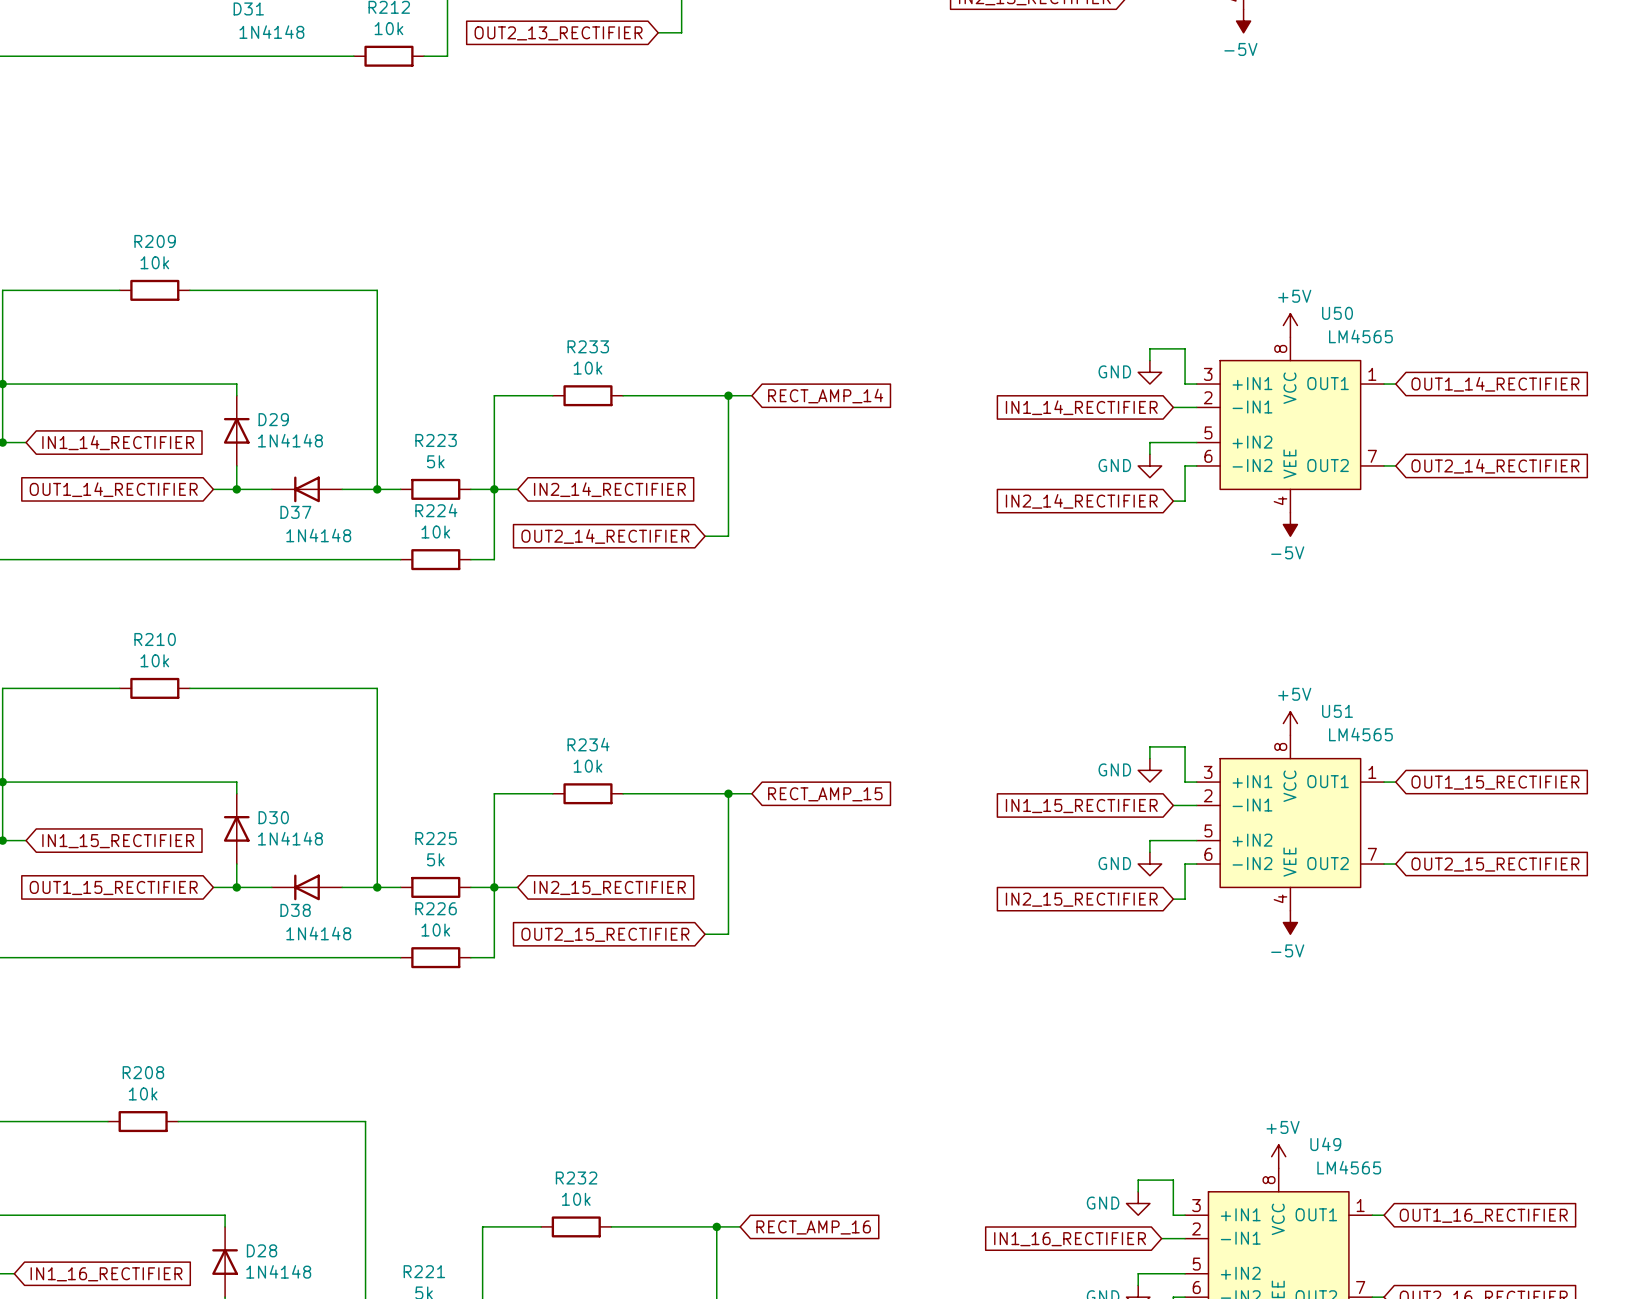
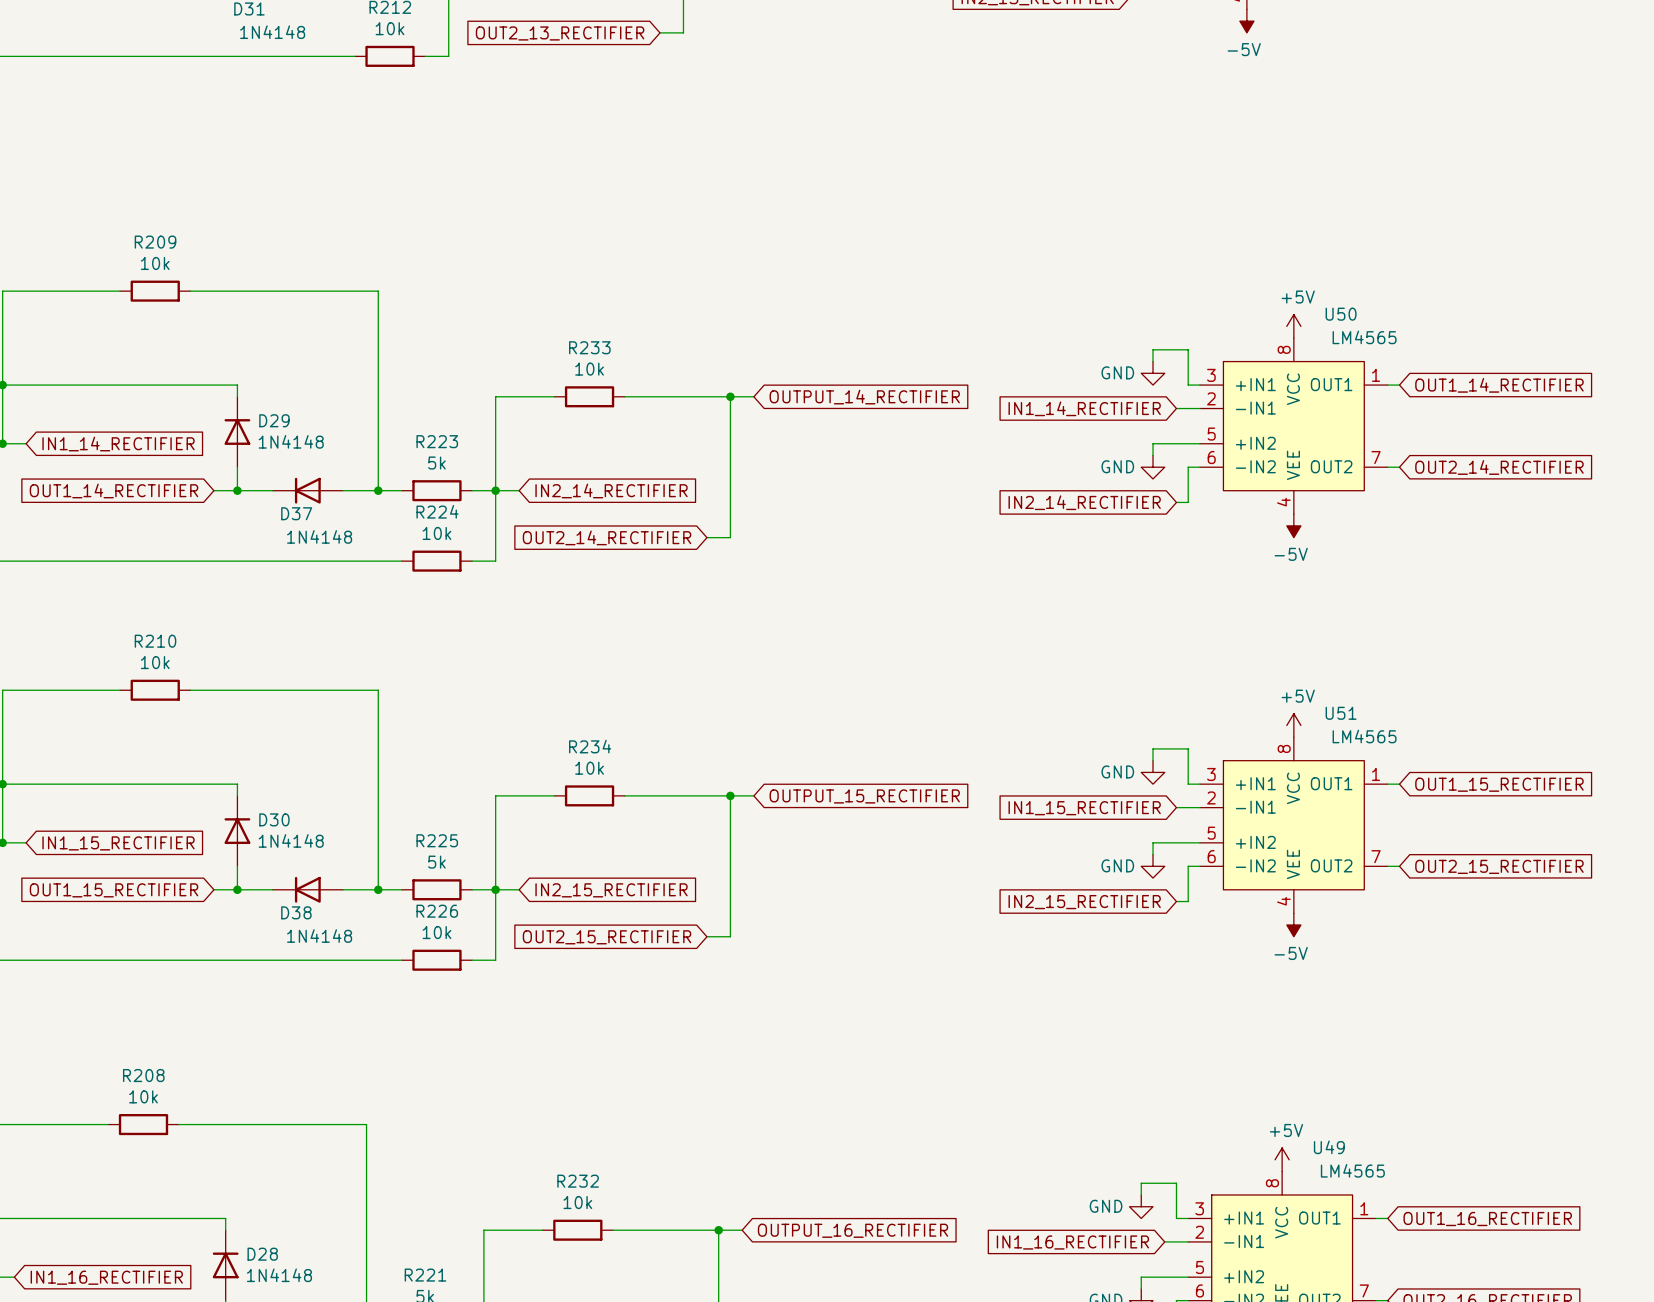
global label: RECT_AMP_14 (825, 396) -> OUTPUT_14_RECTIFIER (864, 397)
global label: RECT_AMP_15 (825, 794) -> OUTPUT_15_RECTIFIER (864, 796)
global label: RECT_AMP_16 (813, 1227) -> OUTPUT_16_RECTIFIER (852, 1230)

